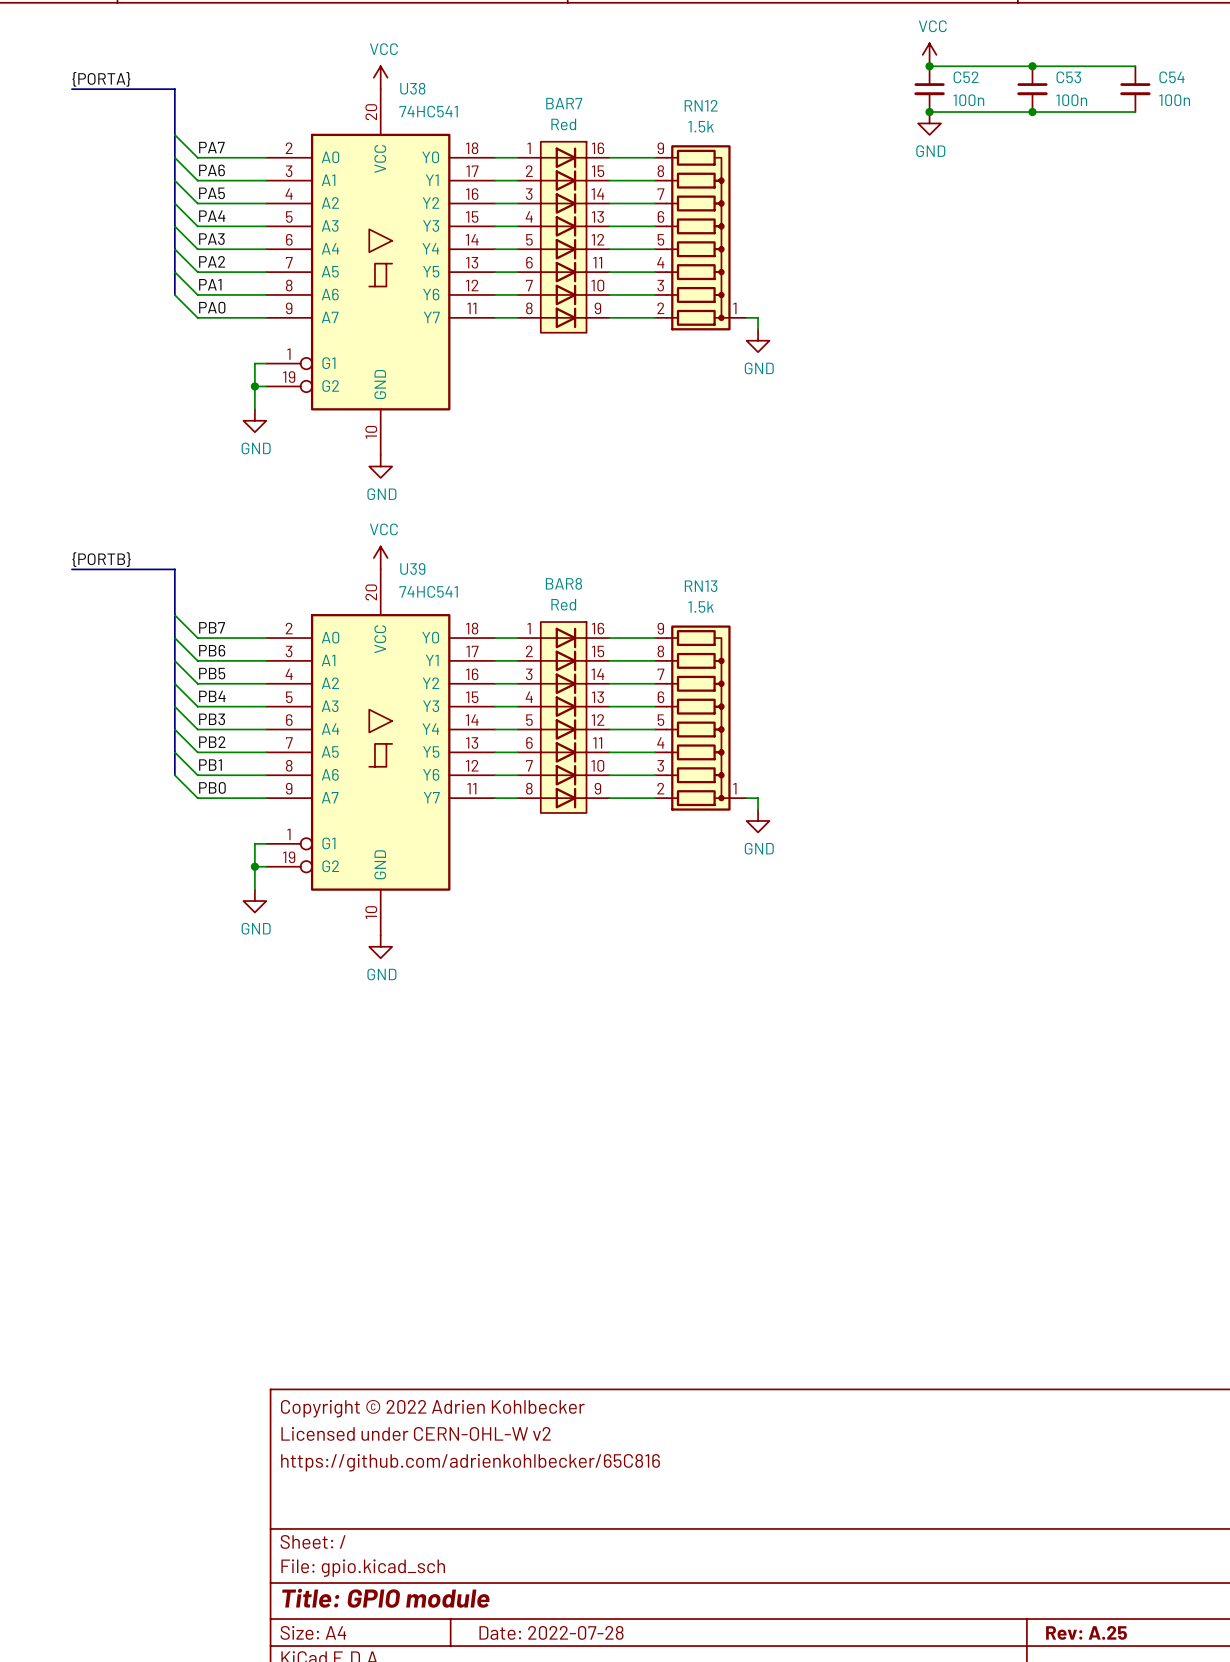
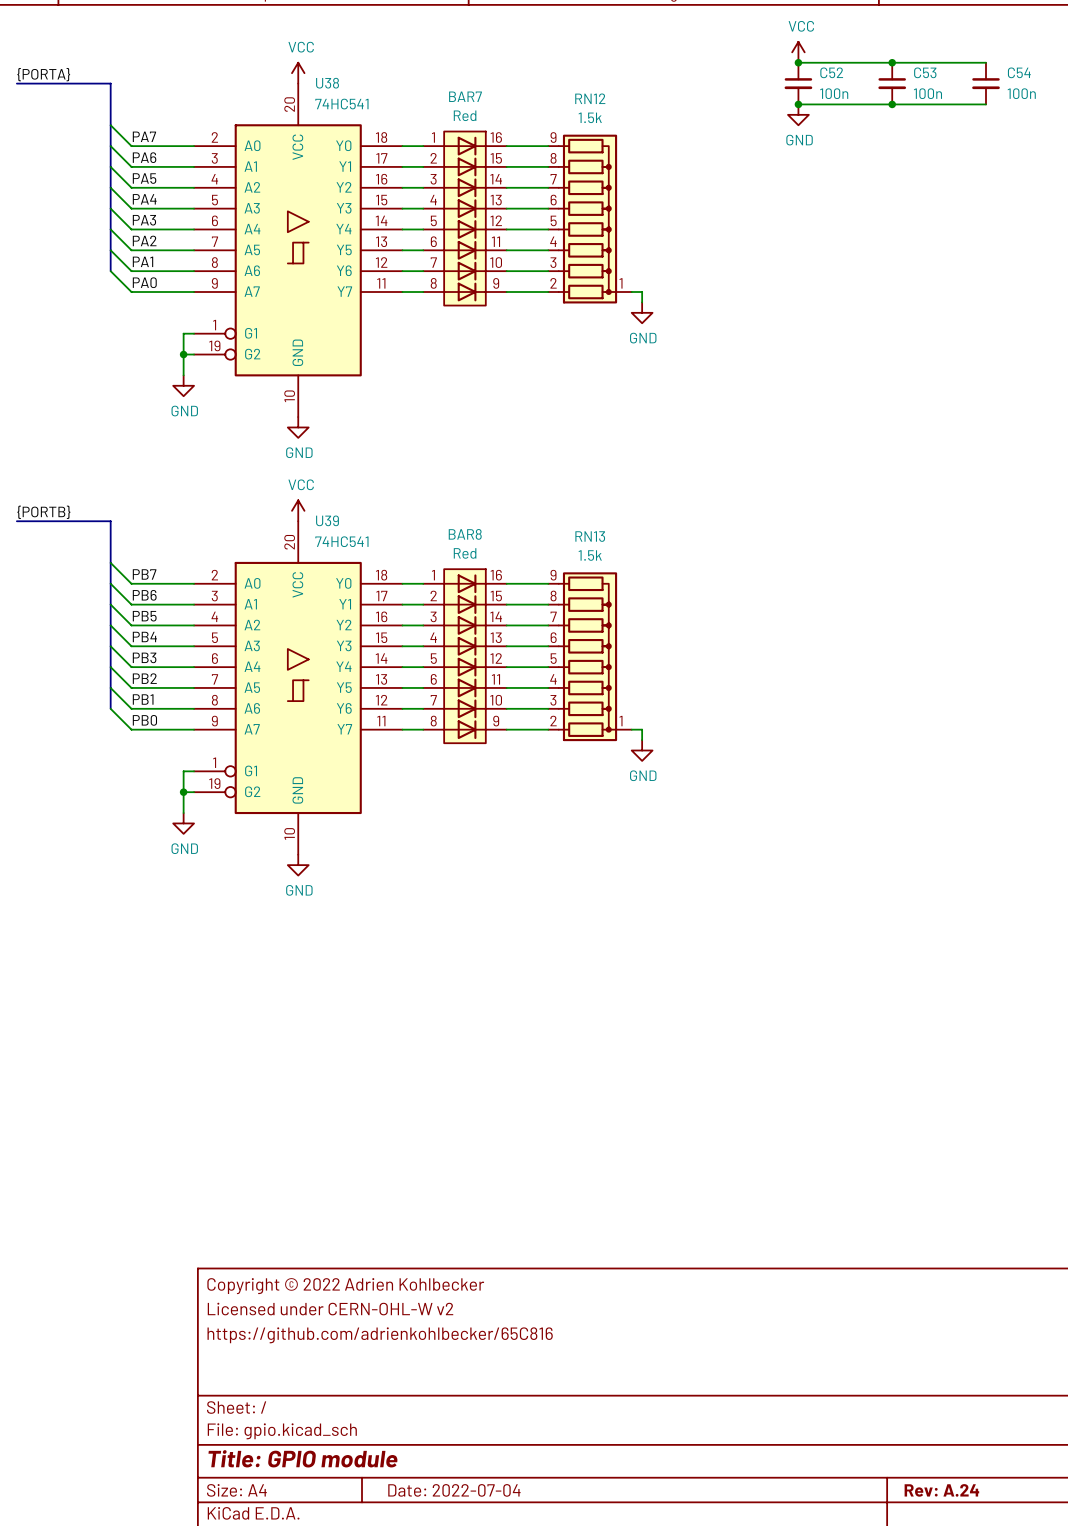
title block: Date: 2022-07-28 (551, 1632) -> Date: 2022-07-04 (454, 1490)
title block: Rev: A.25 (1086, 1632) -> Rev: A.24 (941, 1490)

